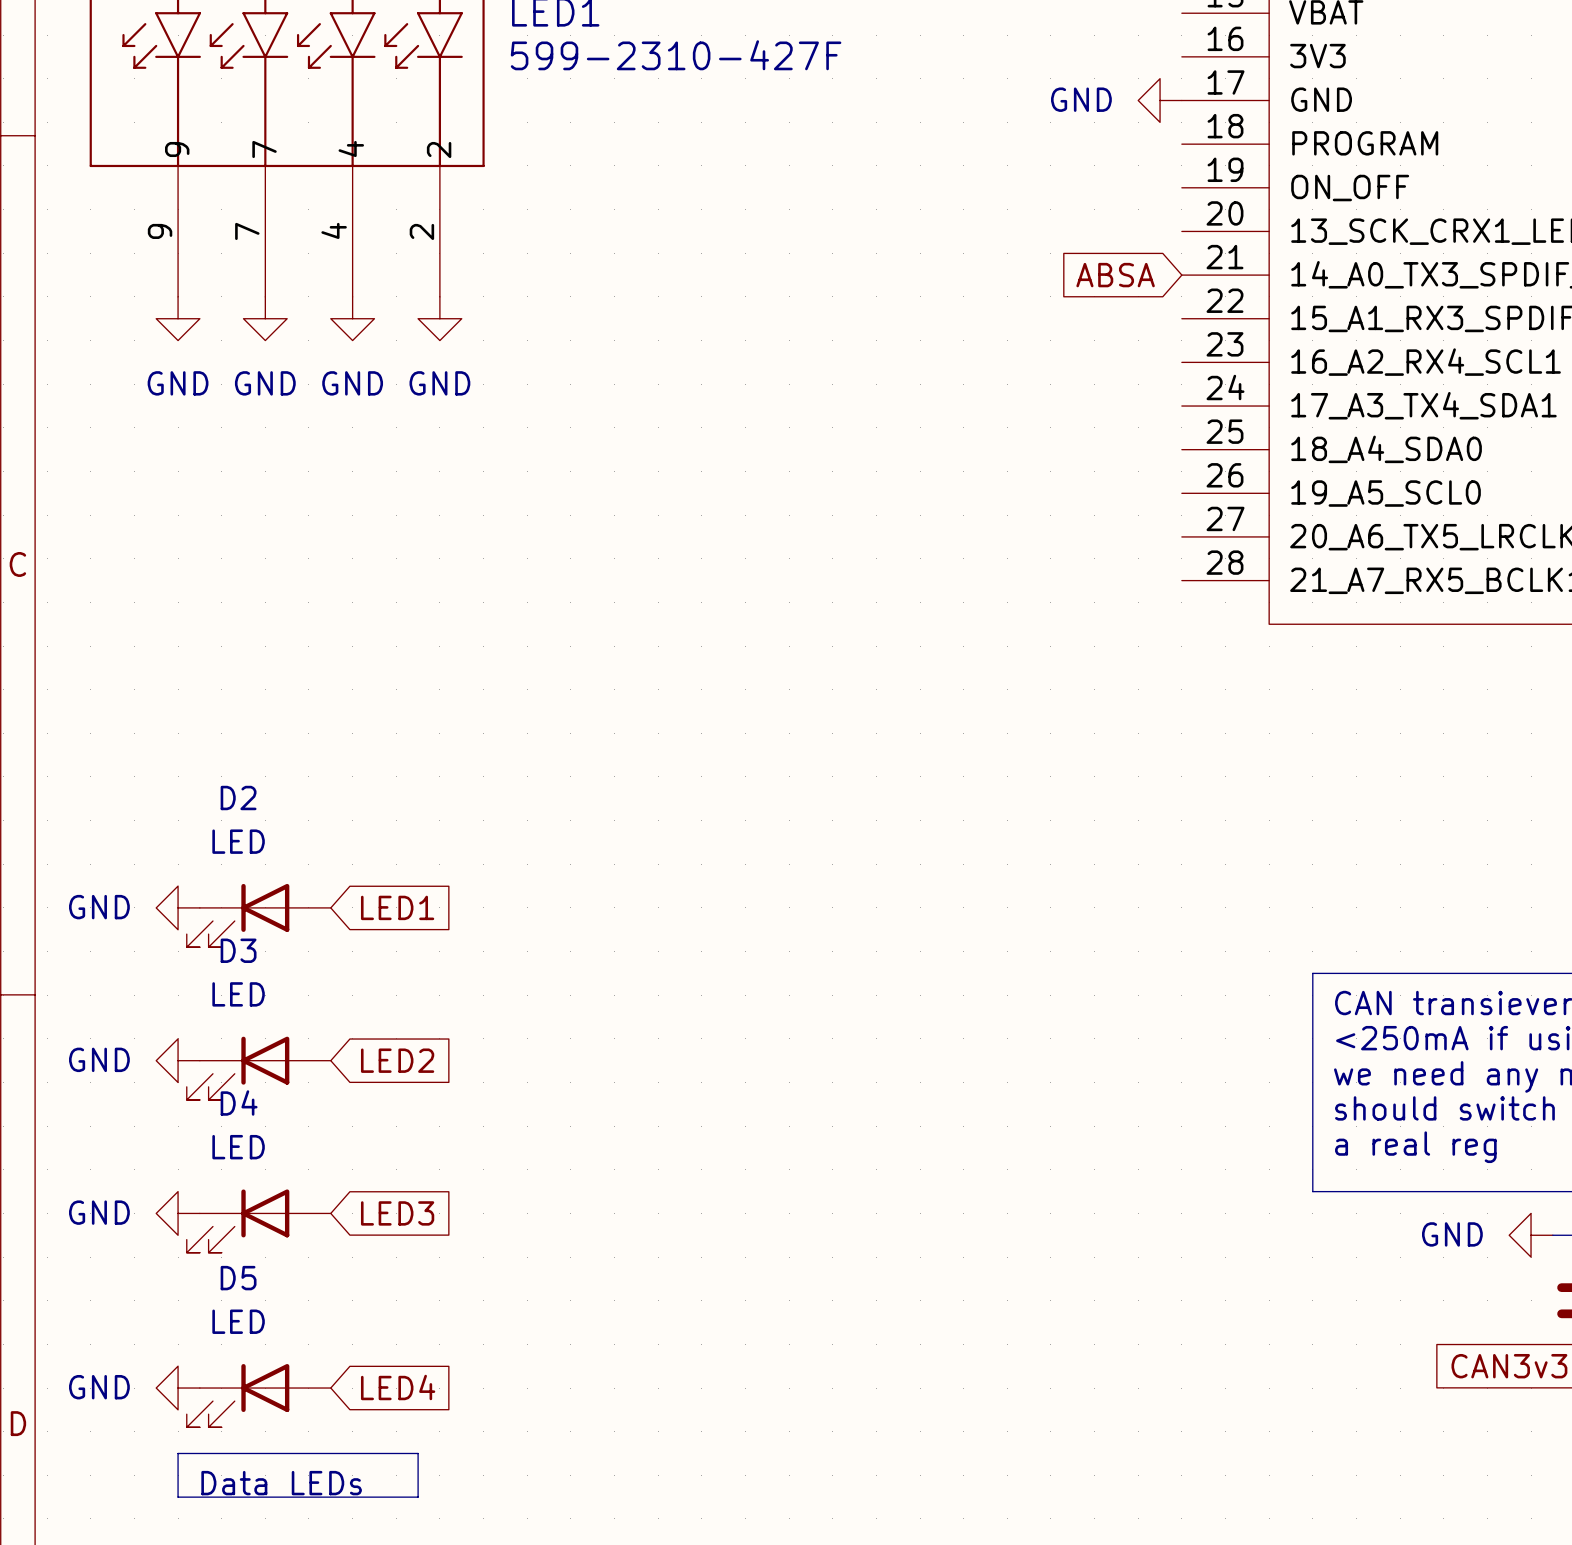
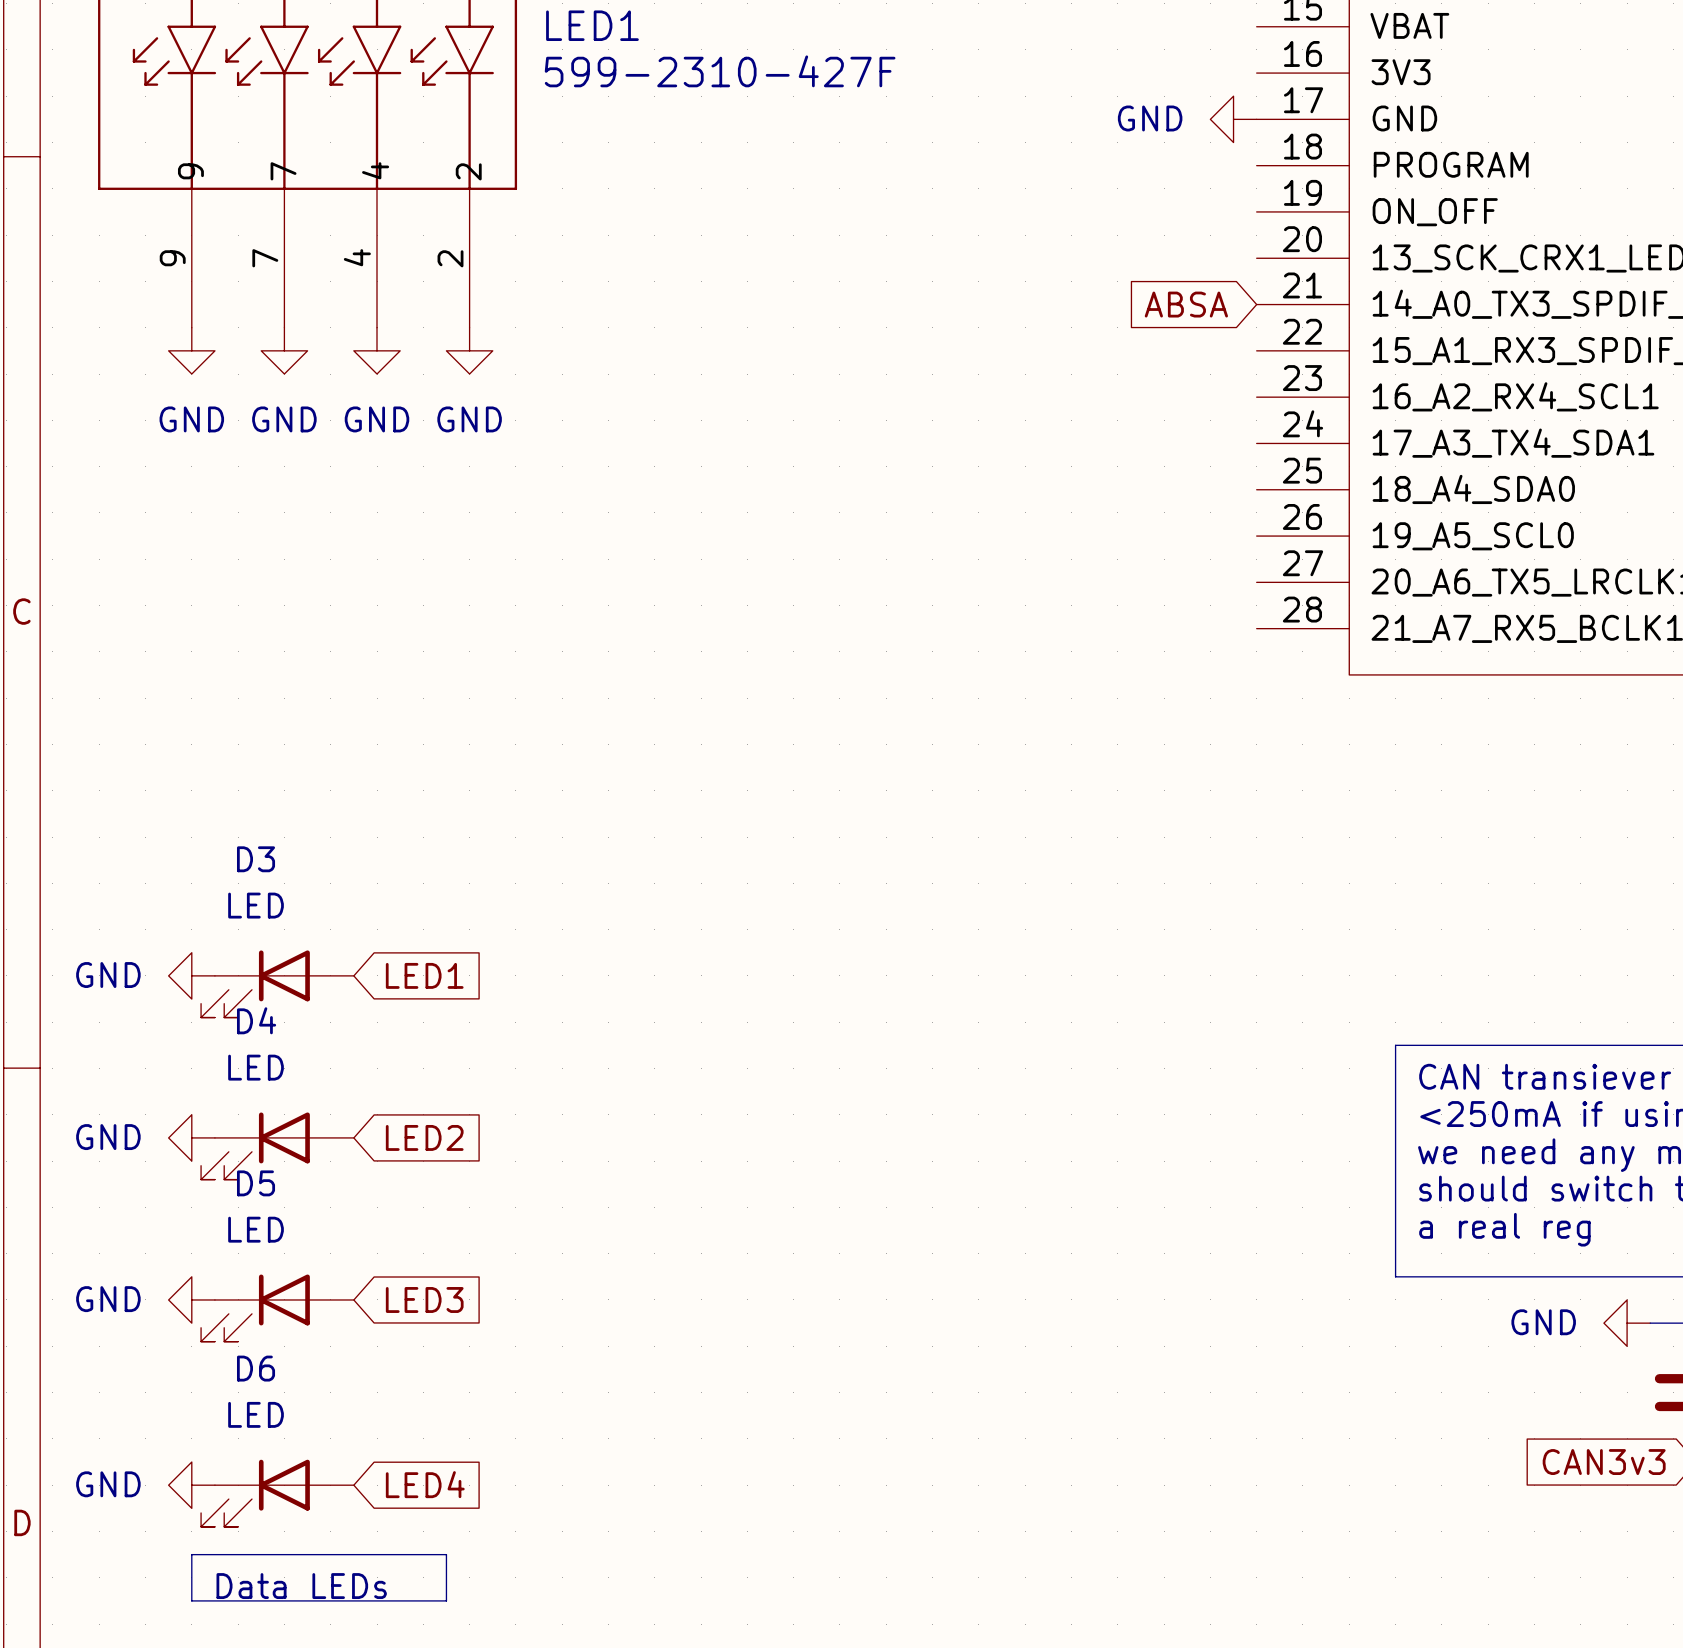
D2 name: D2 (238, 798) -> D3 (256, 859)
D3 name: D3 (238, 950) -> D4 (256, 1020)
D4 name: D4 (239, 1102) -> D5 (256, 1183)
D5 name: D5 (238, 1278) -> D6 (256, 1368)

